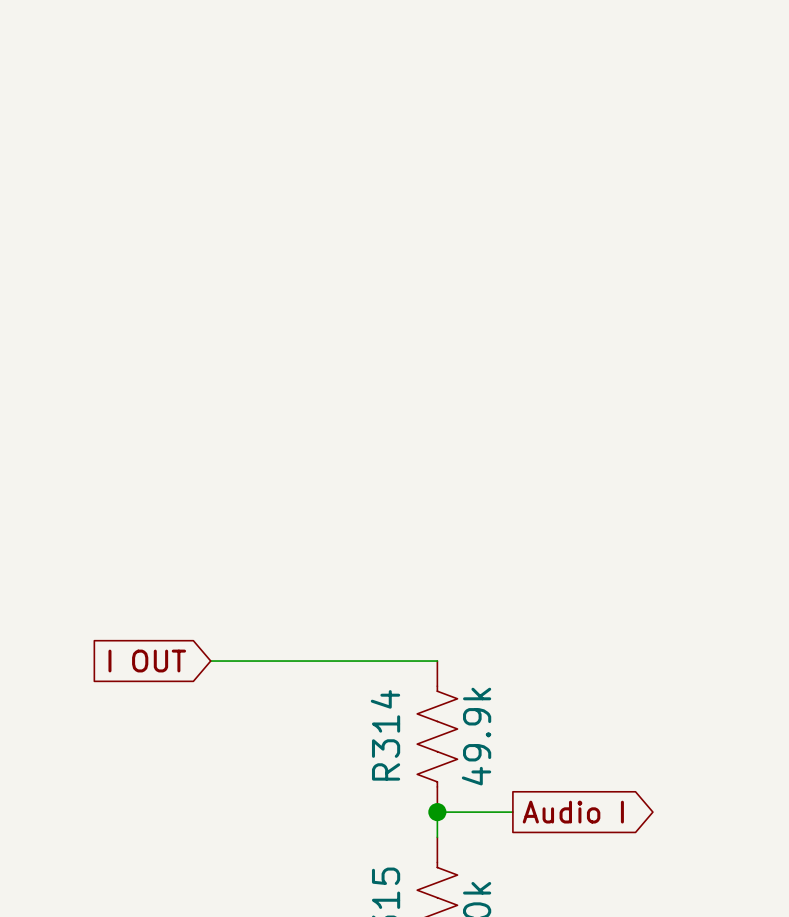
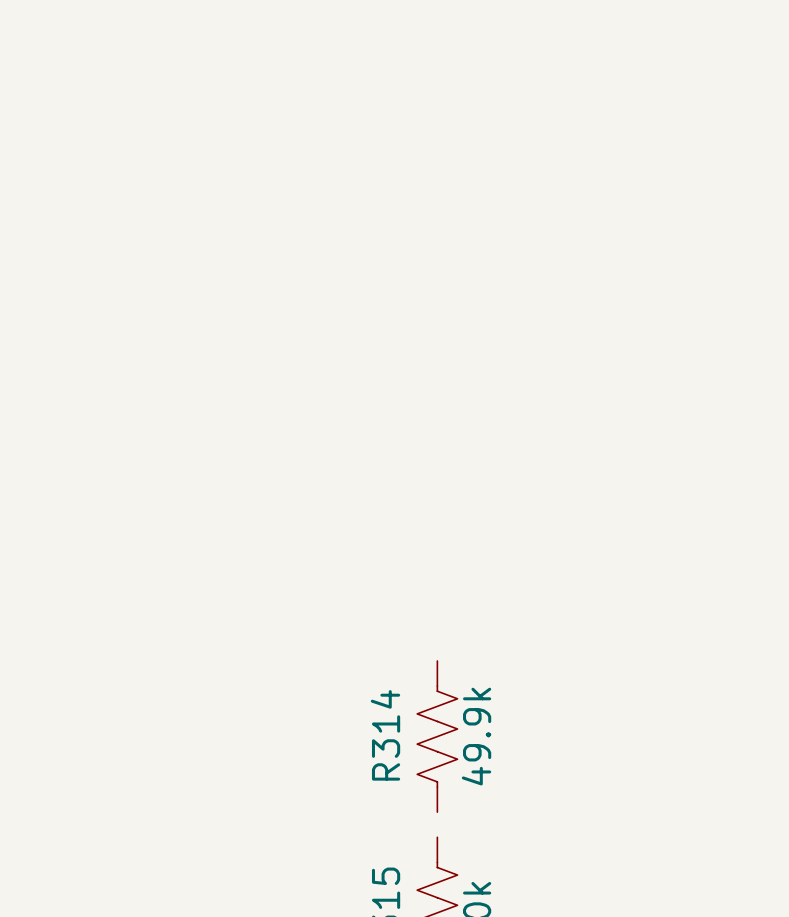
global label: I OUT (147, 661) -> none
wire: (210, 661) (437, 661) -> none
junction: (437, 812) -> none
wire: (512, 812) (437, 812) (437, 837) -> none
global label: Audio I (573, 812) -> none

